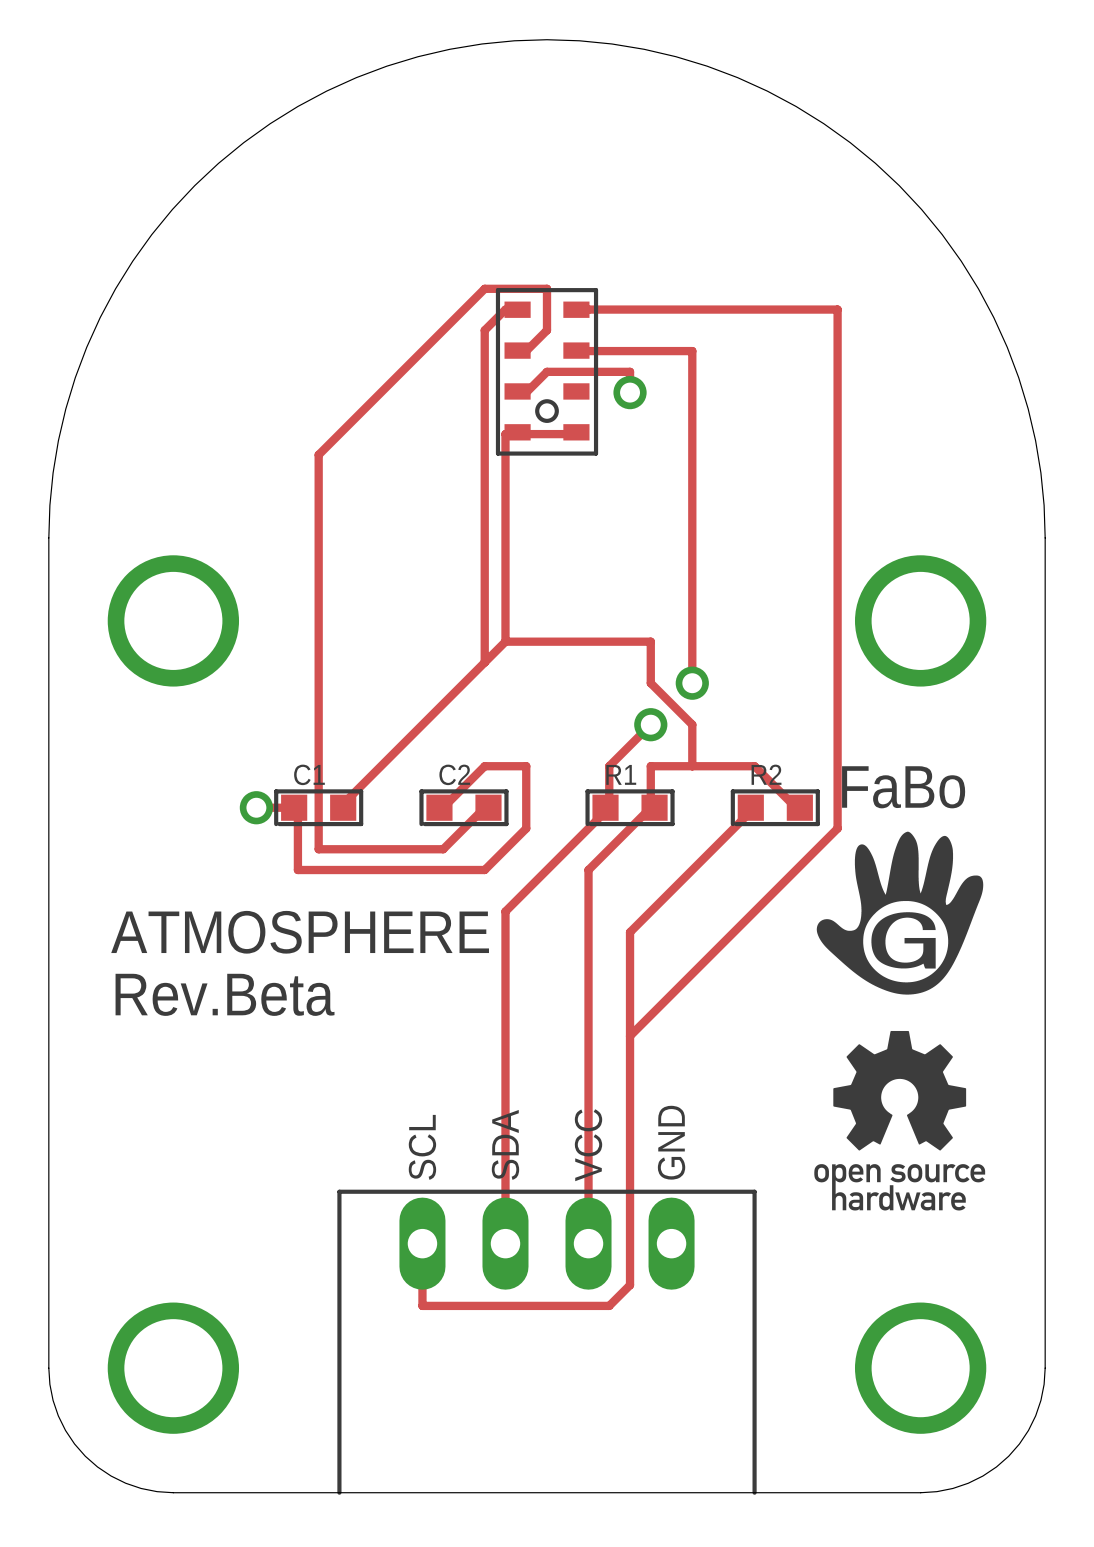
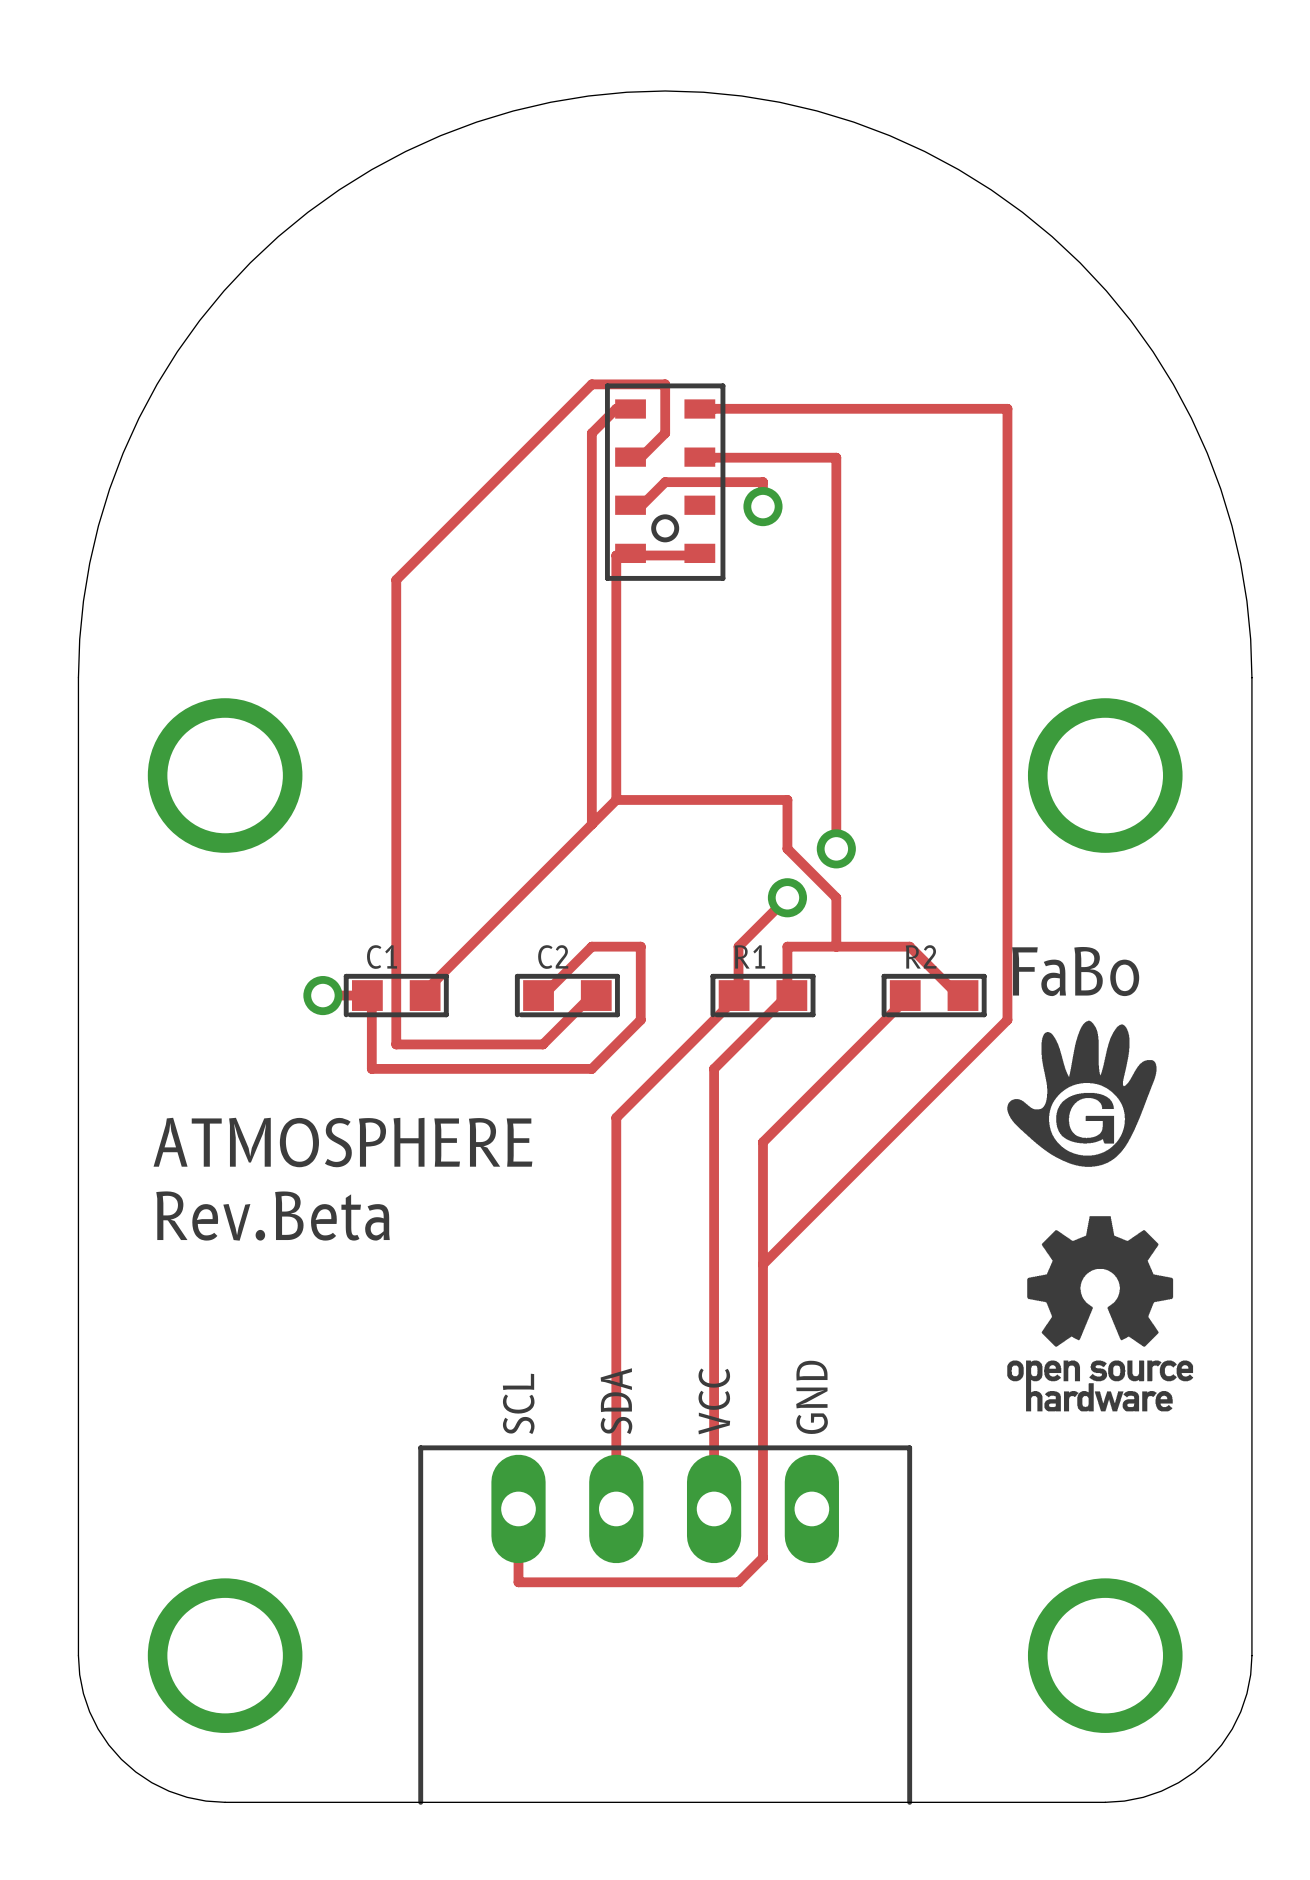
drawing shape: [816, 831, 984, 995] -> [1007, 1020, 1157, 1167]
drawing: none -> [1007, 1216, 1194, 1412]
drawing: [814, 1030, 986, 1211] -> none

